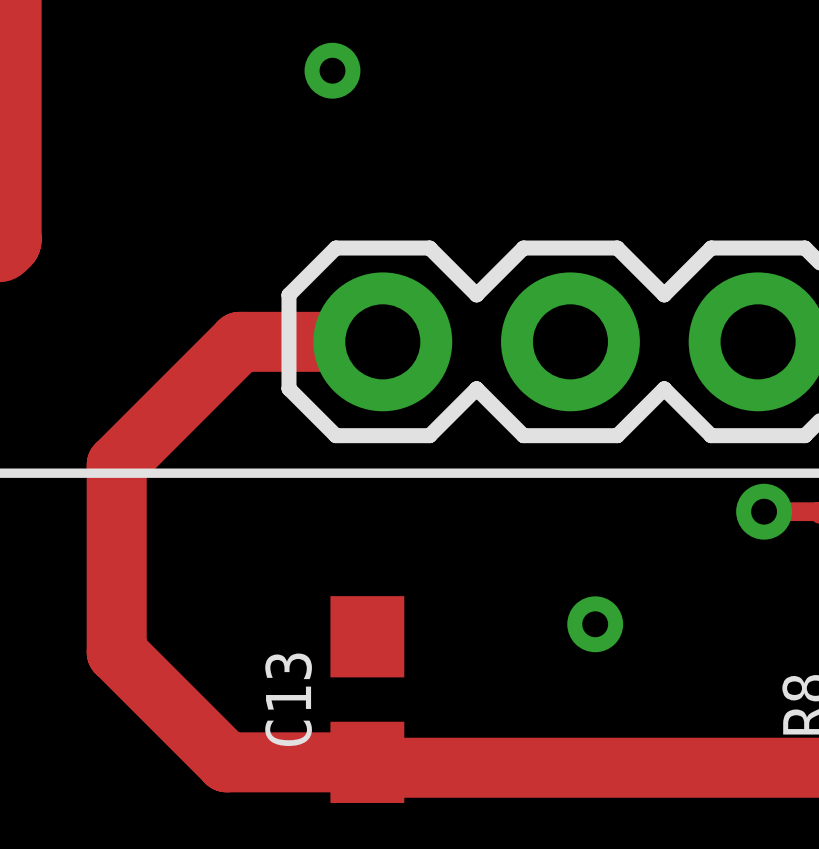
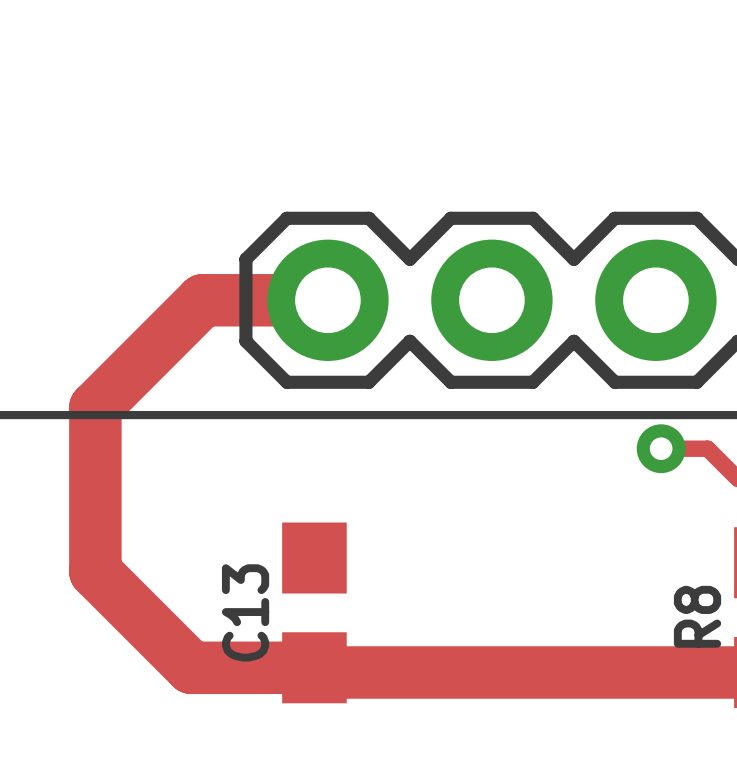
via: (332, 70) -> none
via: (595, 624) -> none

